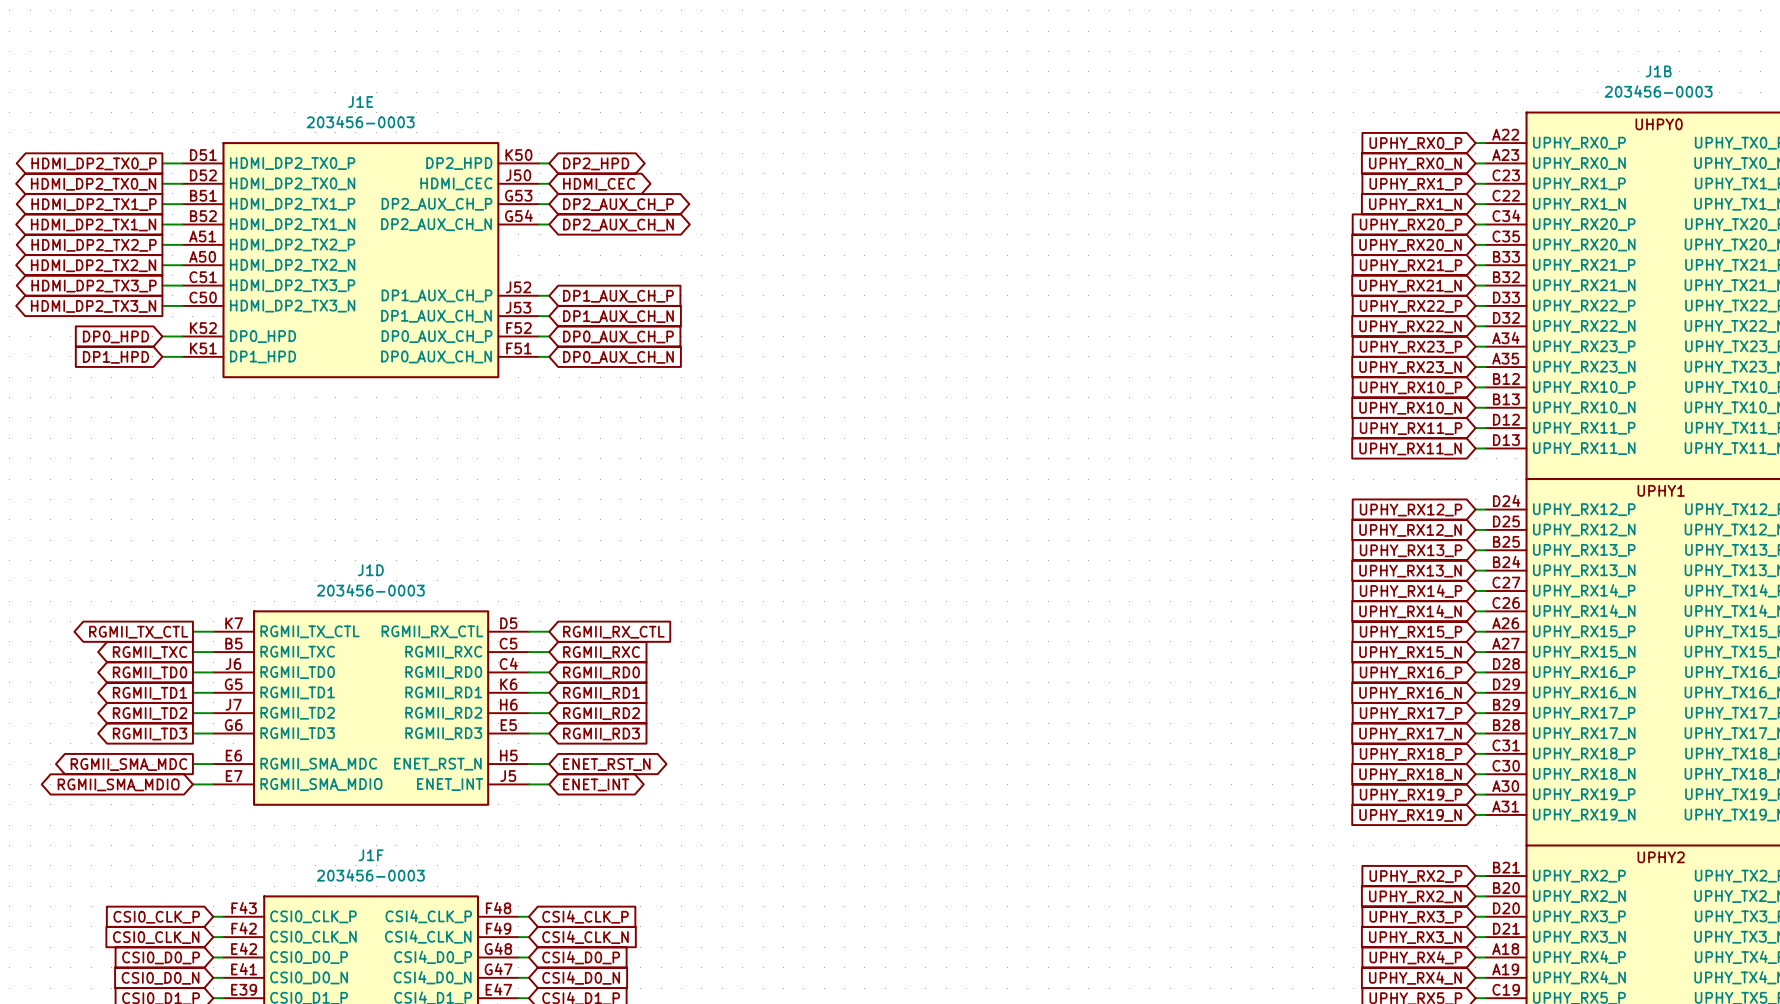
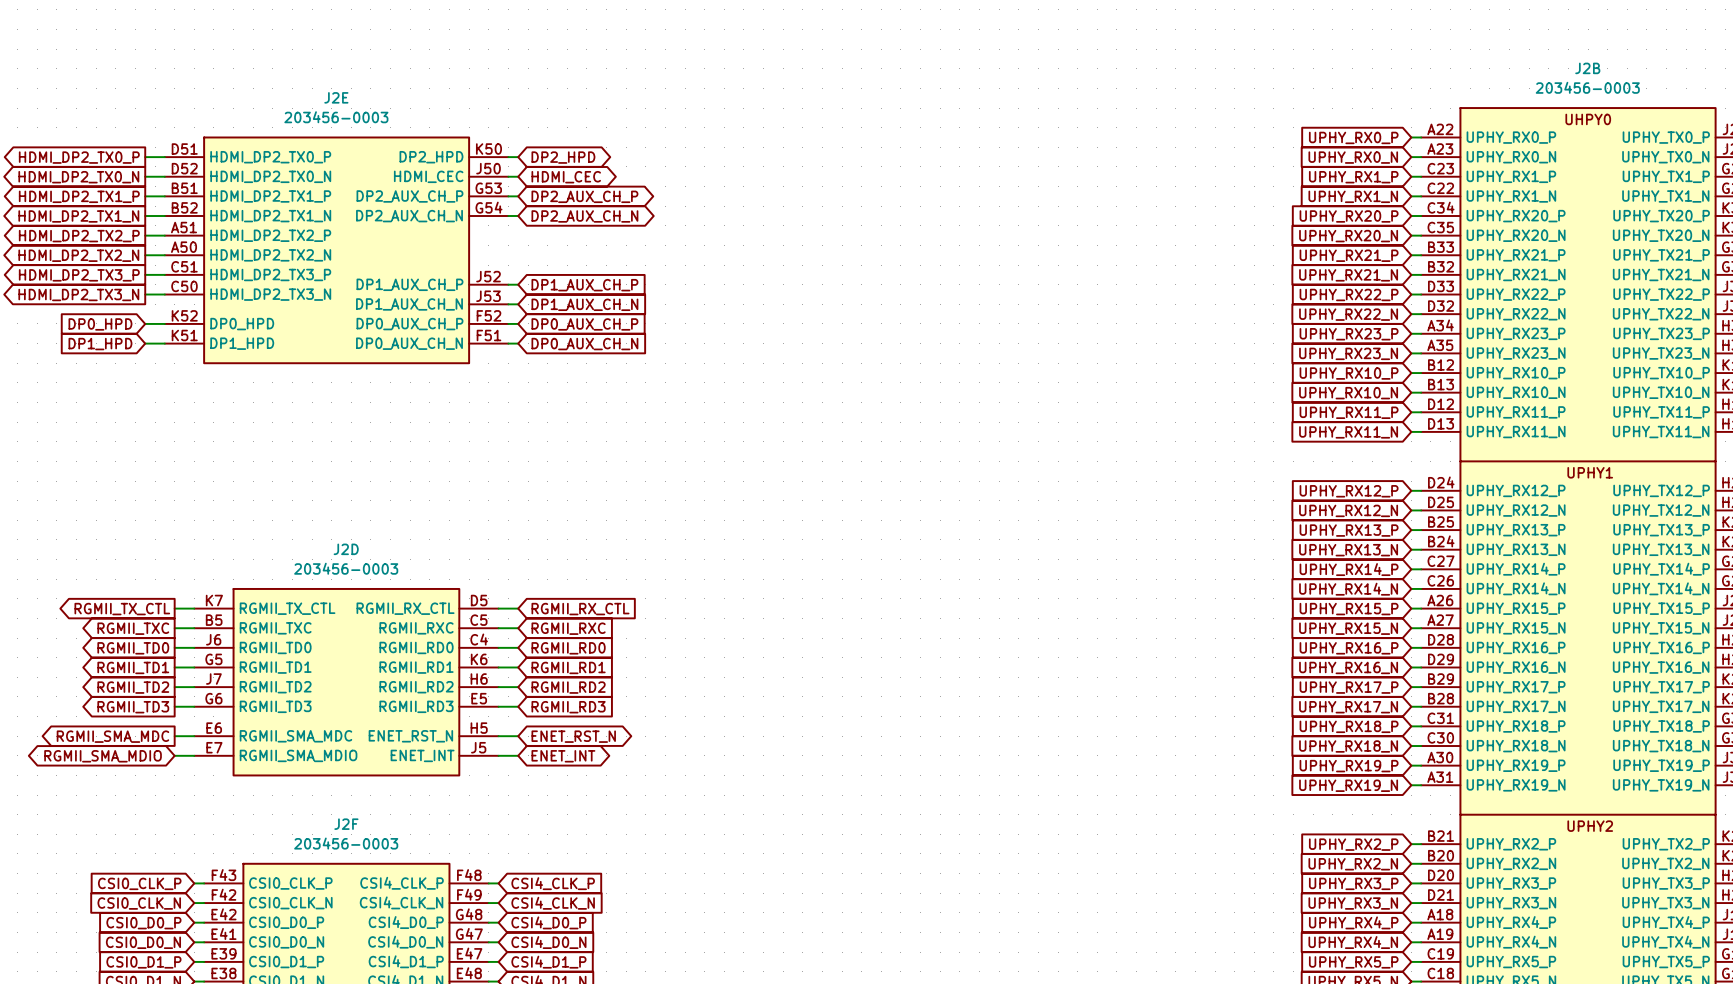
J1B name: J1B (1658, 71) -> J2B (1587, 68)
J1E name: J1E (360, 101) -> J2E (336, 97)
J1D name: J1D (370, 570) -> J2D (346, 549)
J1F name: J1F (371, 855) -> J2F (346, 824)

